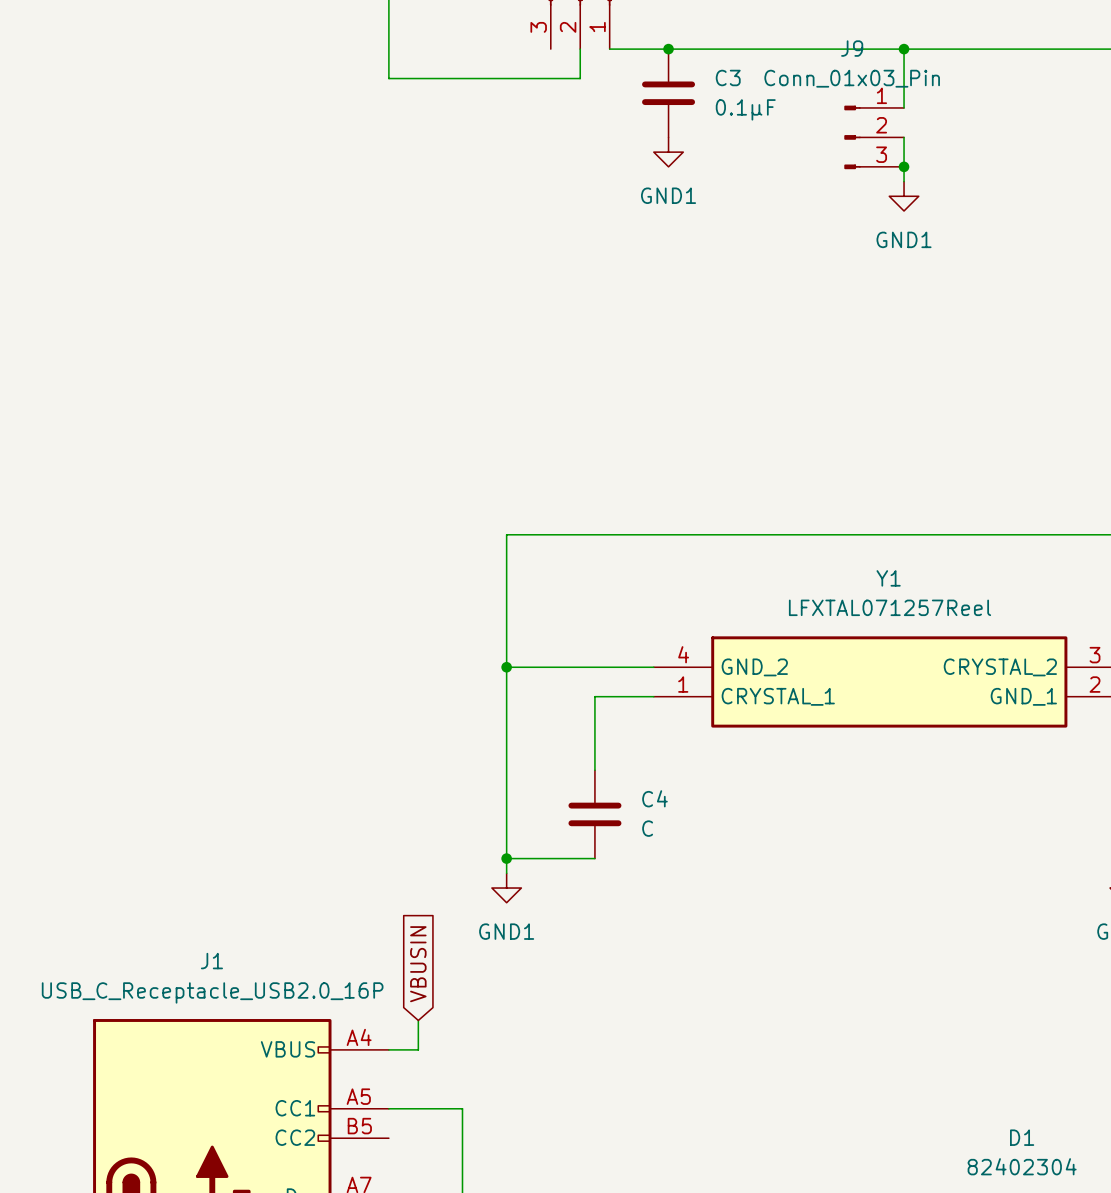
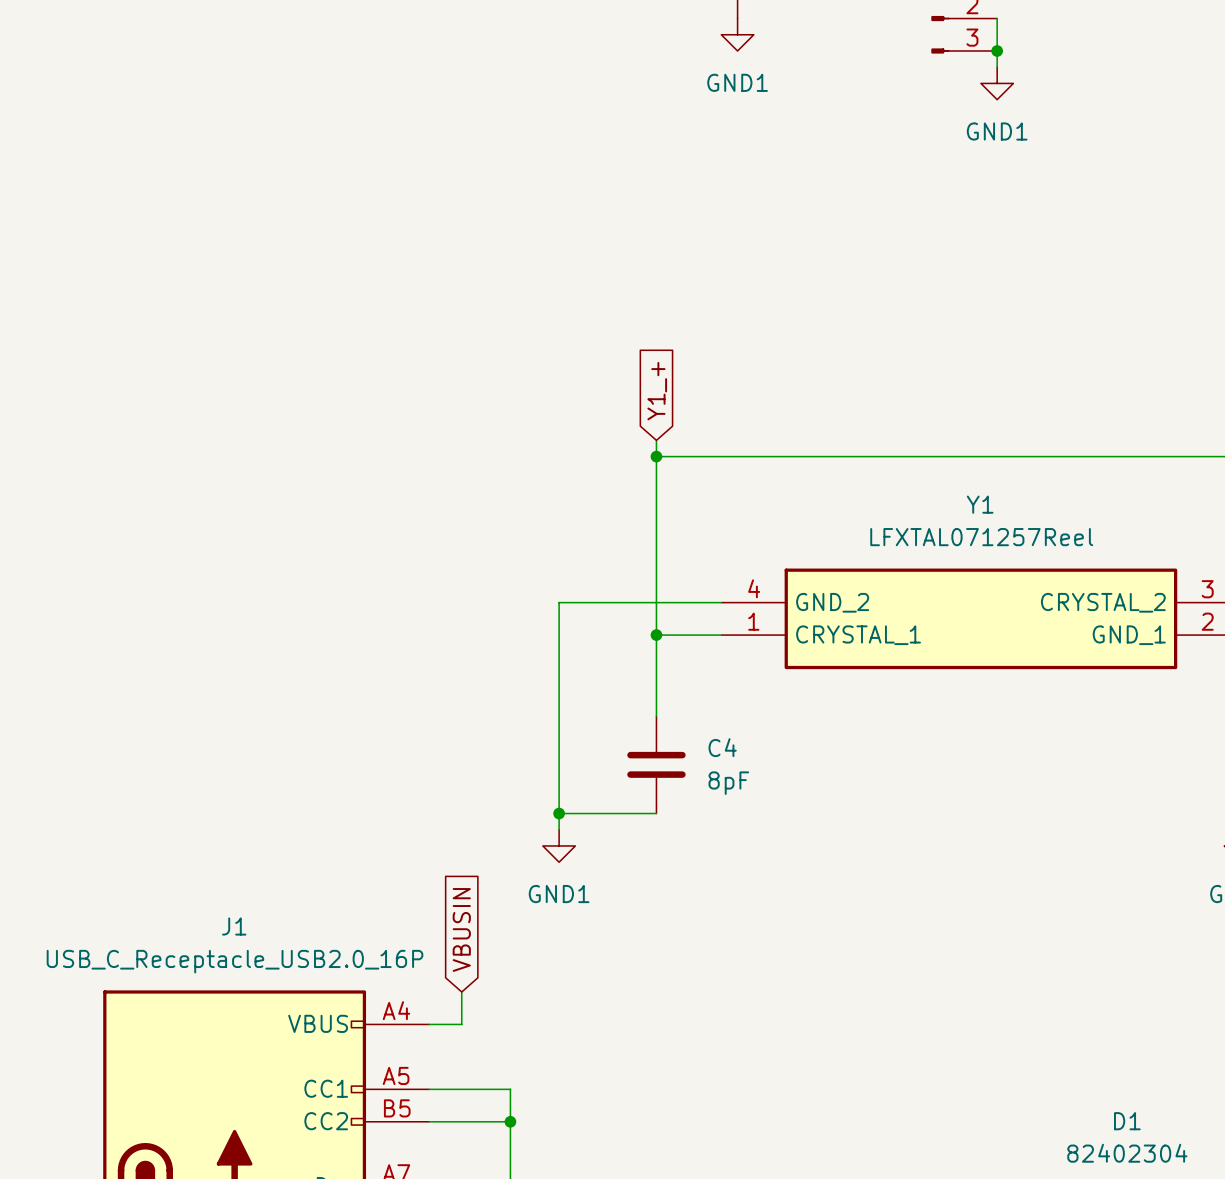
global label: none -> Y1_+ (657, 391)
wire: none -> (656, 440) (656, 635)
wire: (594, 534) (506, 534) (506, 667) -> none
junction: none -> (656, 456)
junction: (506, 667) -> none
junction: none -> (656, 635)
C4 value: C (647, 828) -> 8pF (728, 783)
wire: none -> (429, 1121) (510, 1121)
junction: none -> (510, 1121)

